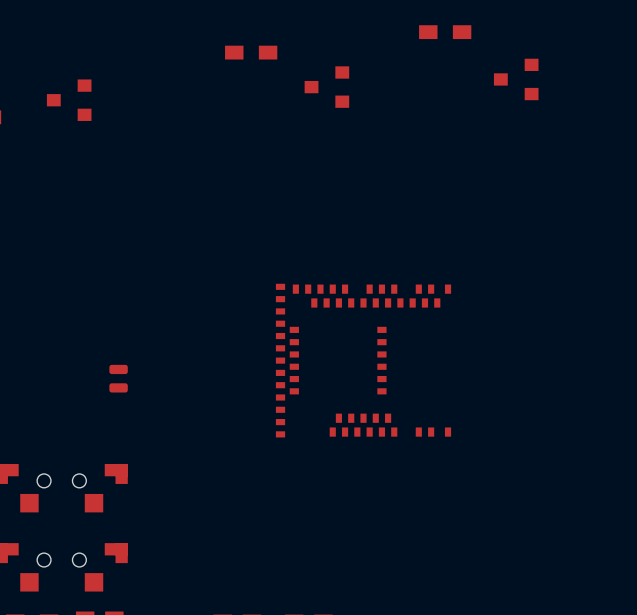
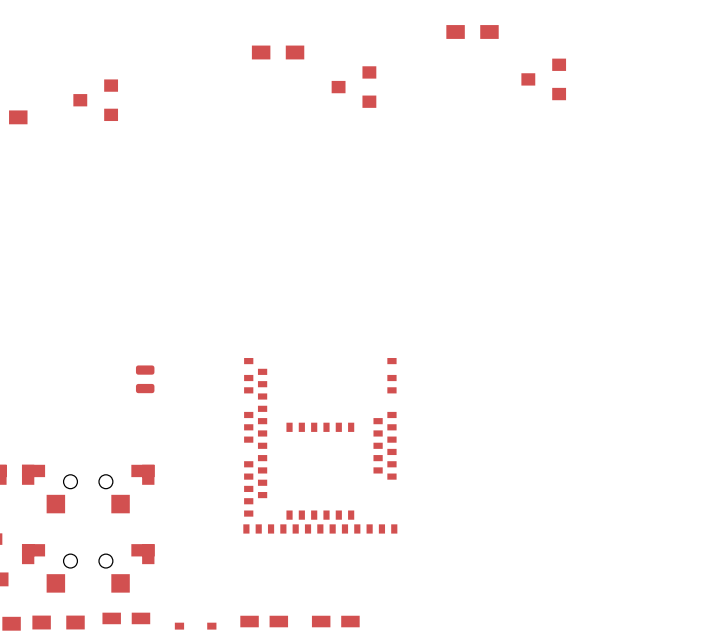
part rotation: 0° (363, 360) -> 90° counterclockwise (320, 445)
part position: (363, 360) -> (320, 445)

